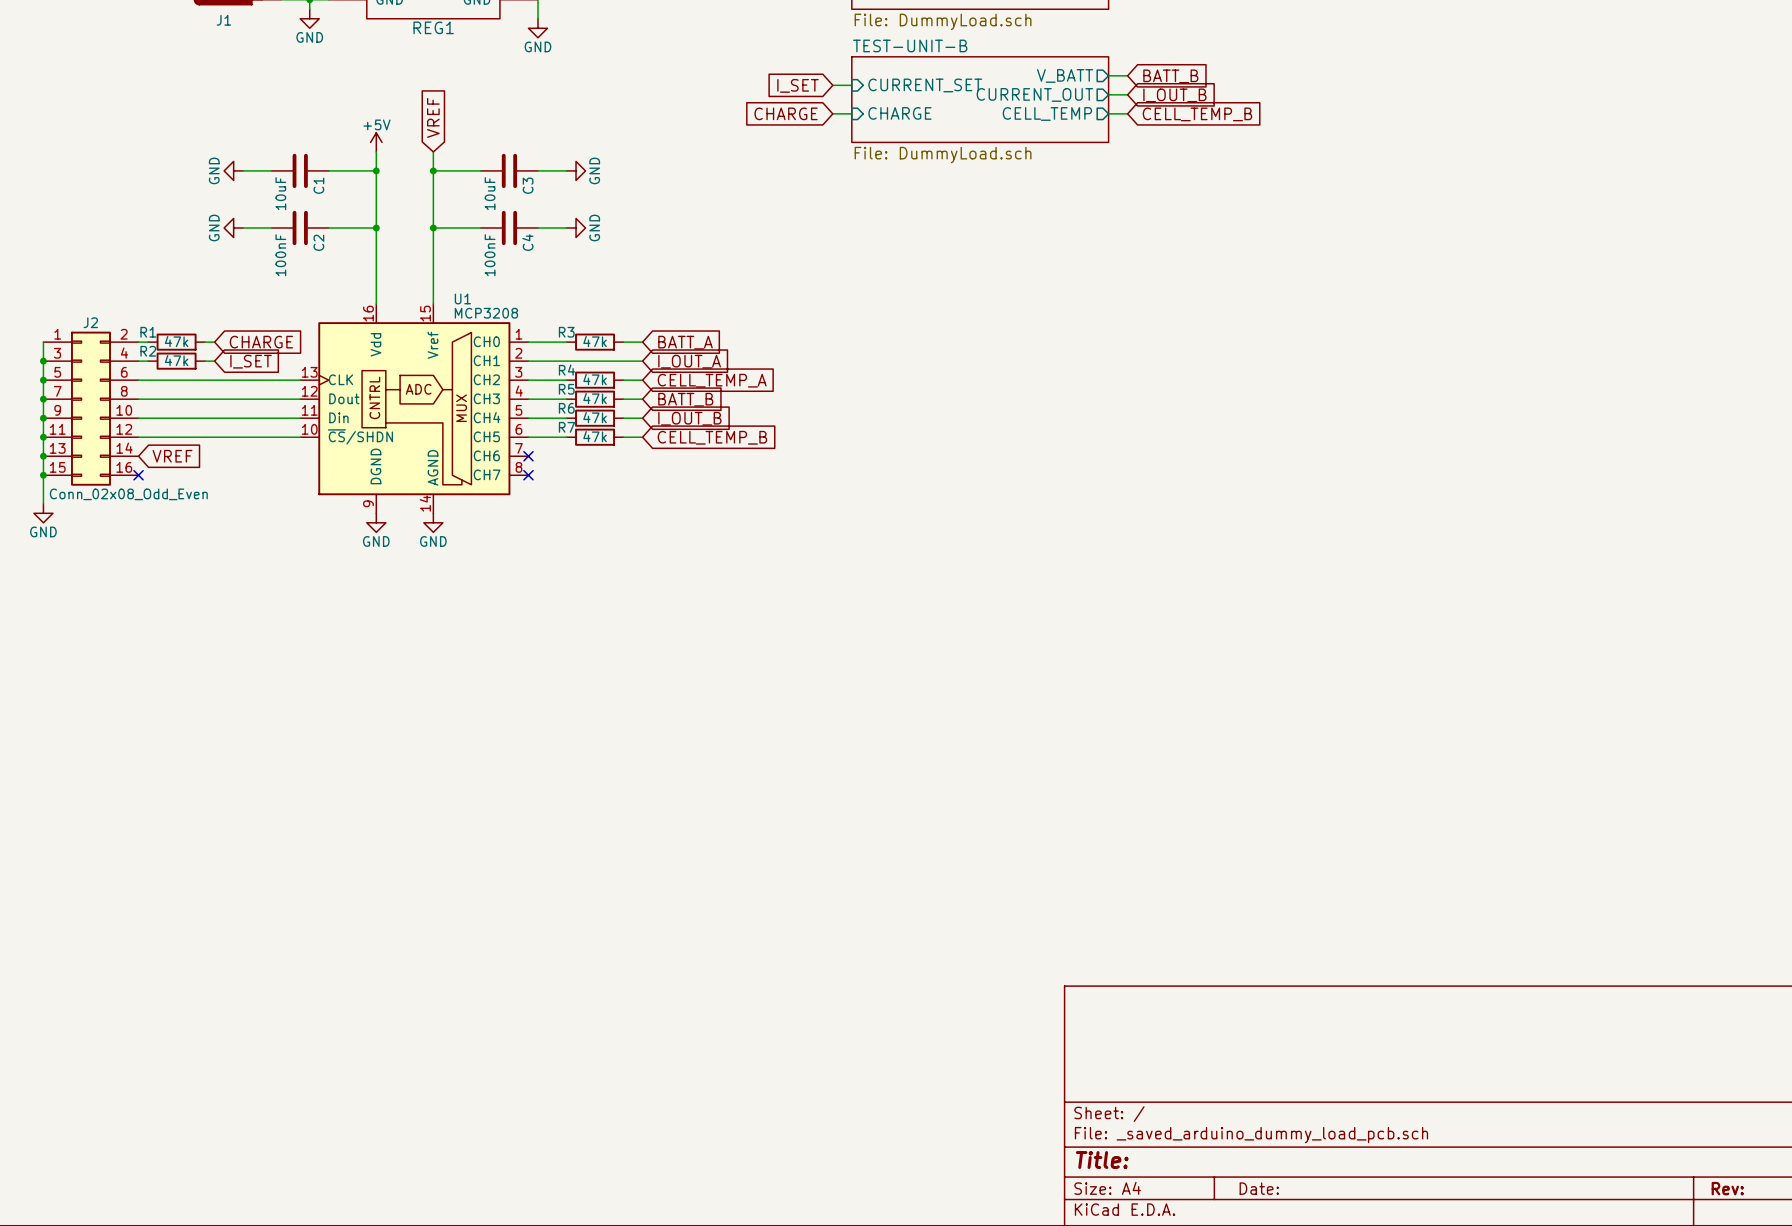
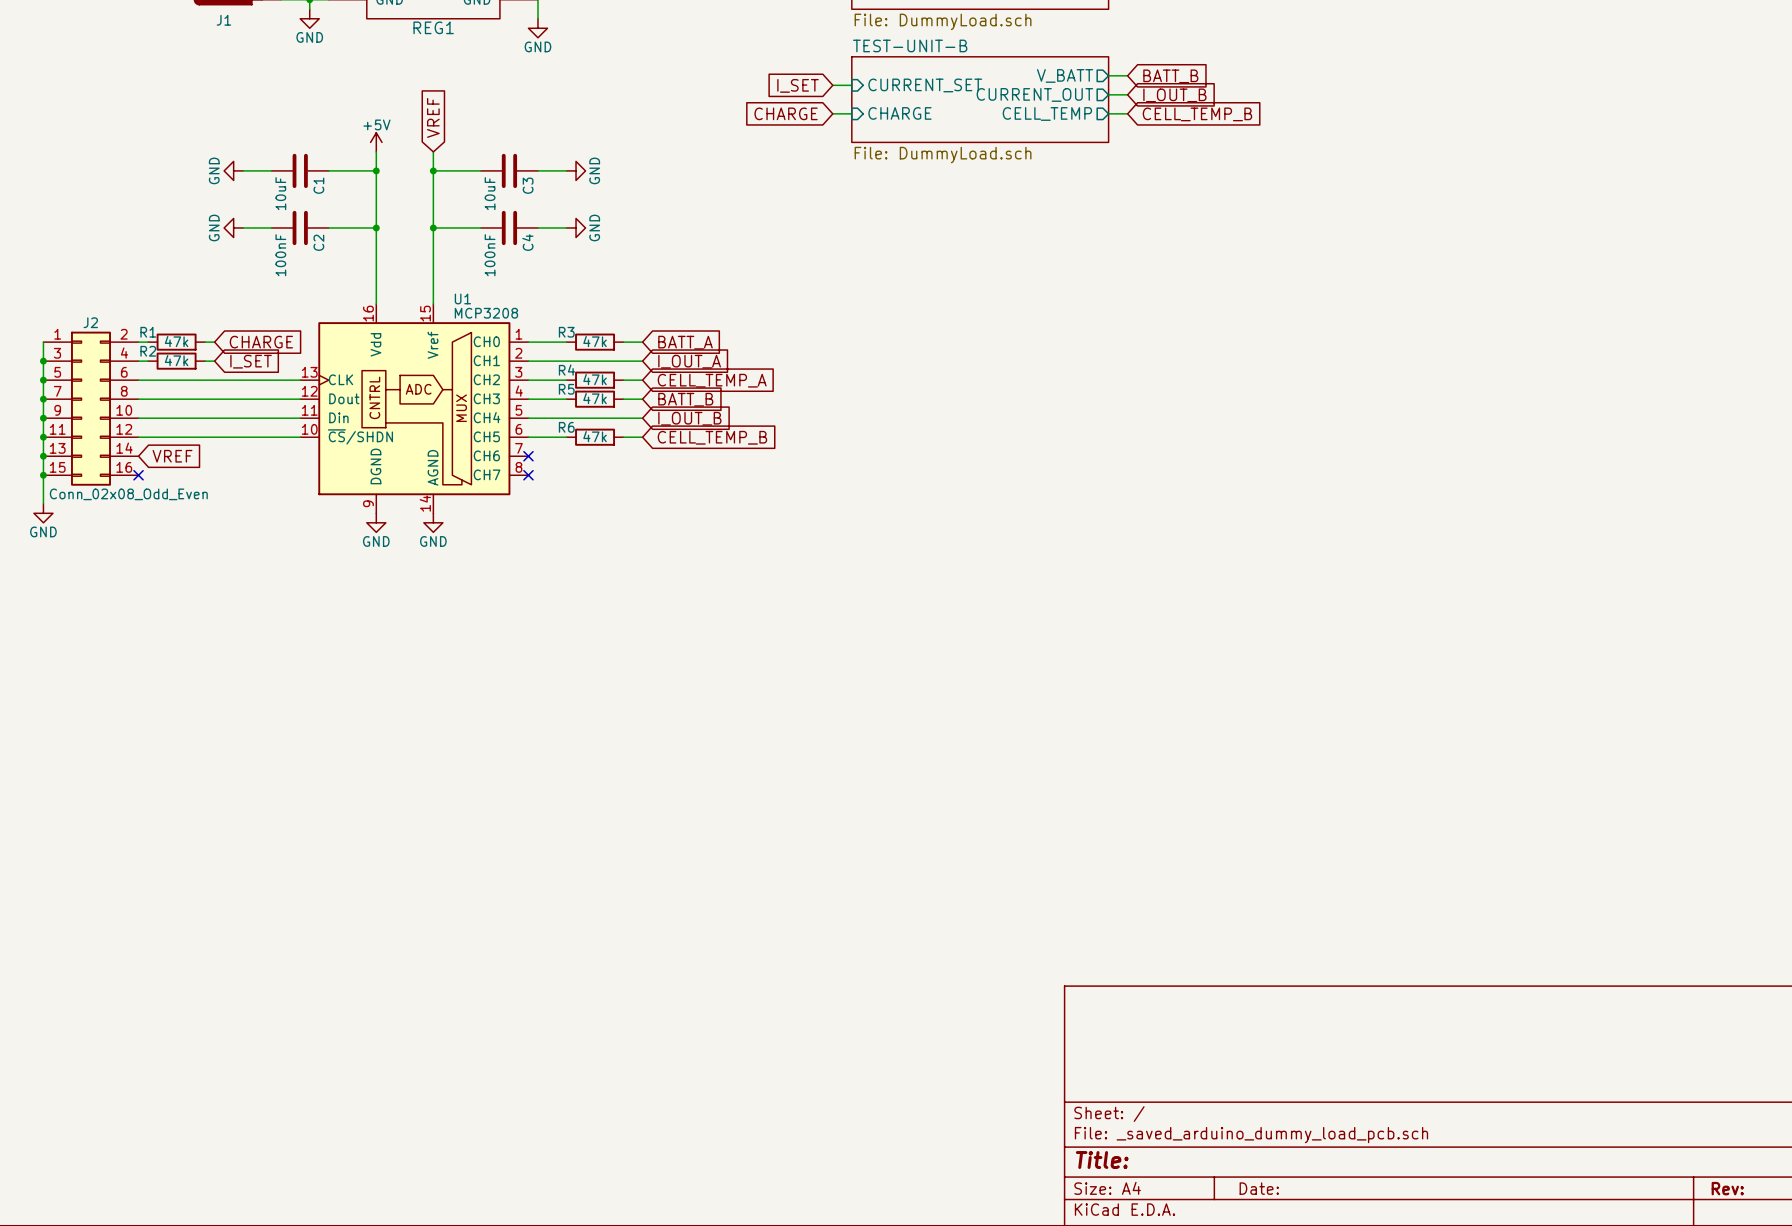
wire: none -> (566, 418) (623, 418)
R6: 47k (595, 418) -> none
R7 name: R7 (566, 427) -> R6 (566, 427)

